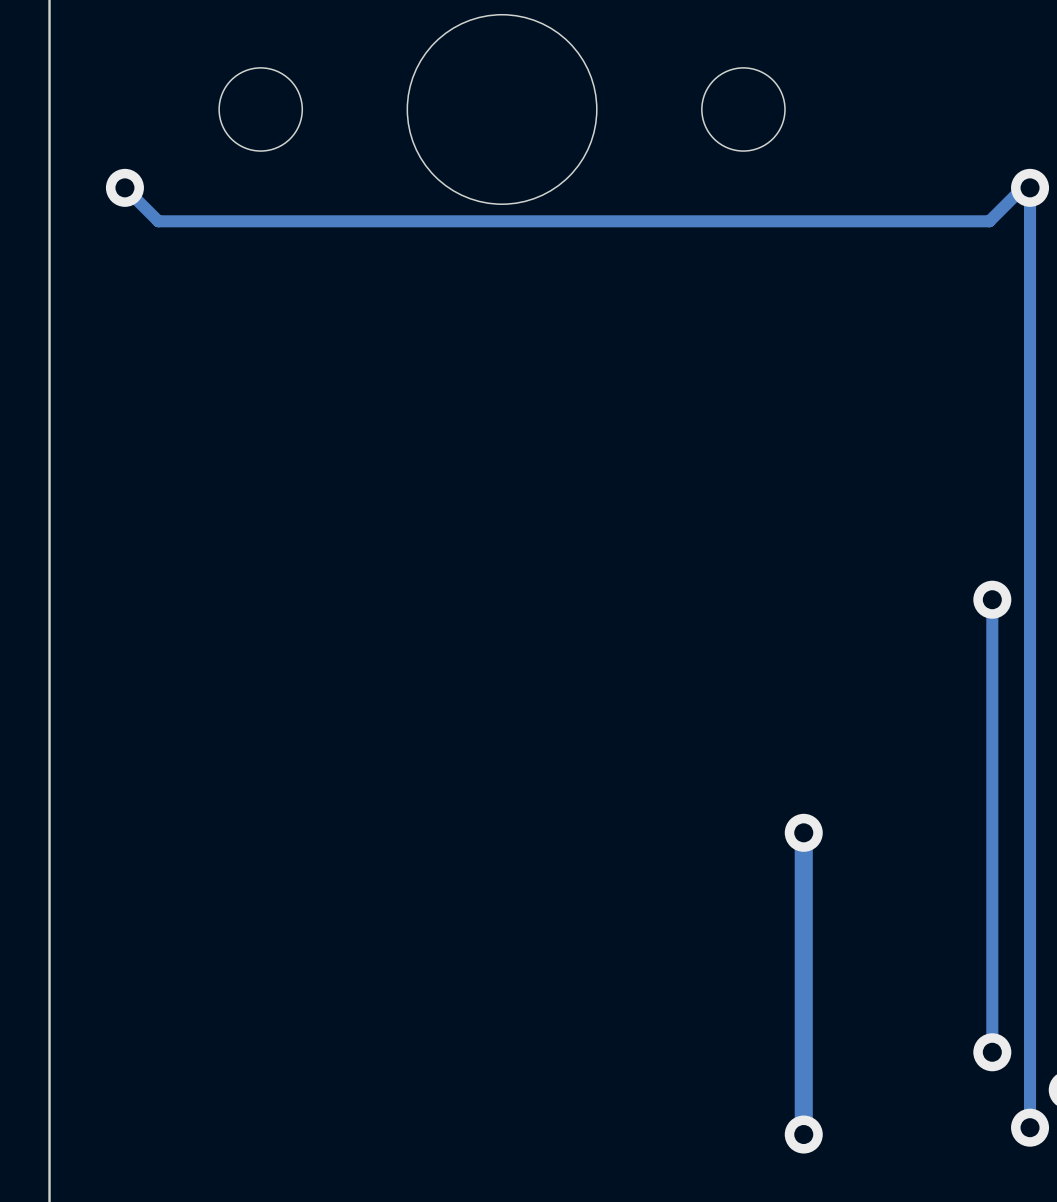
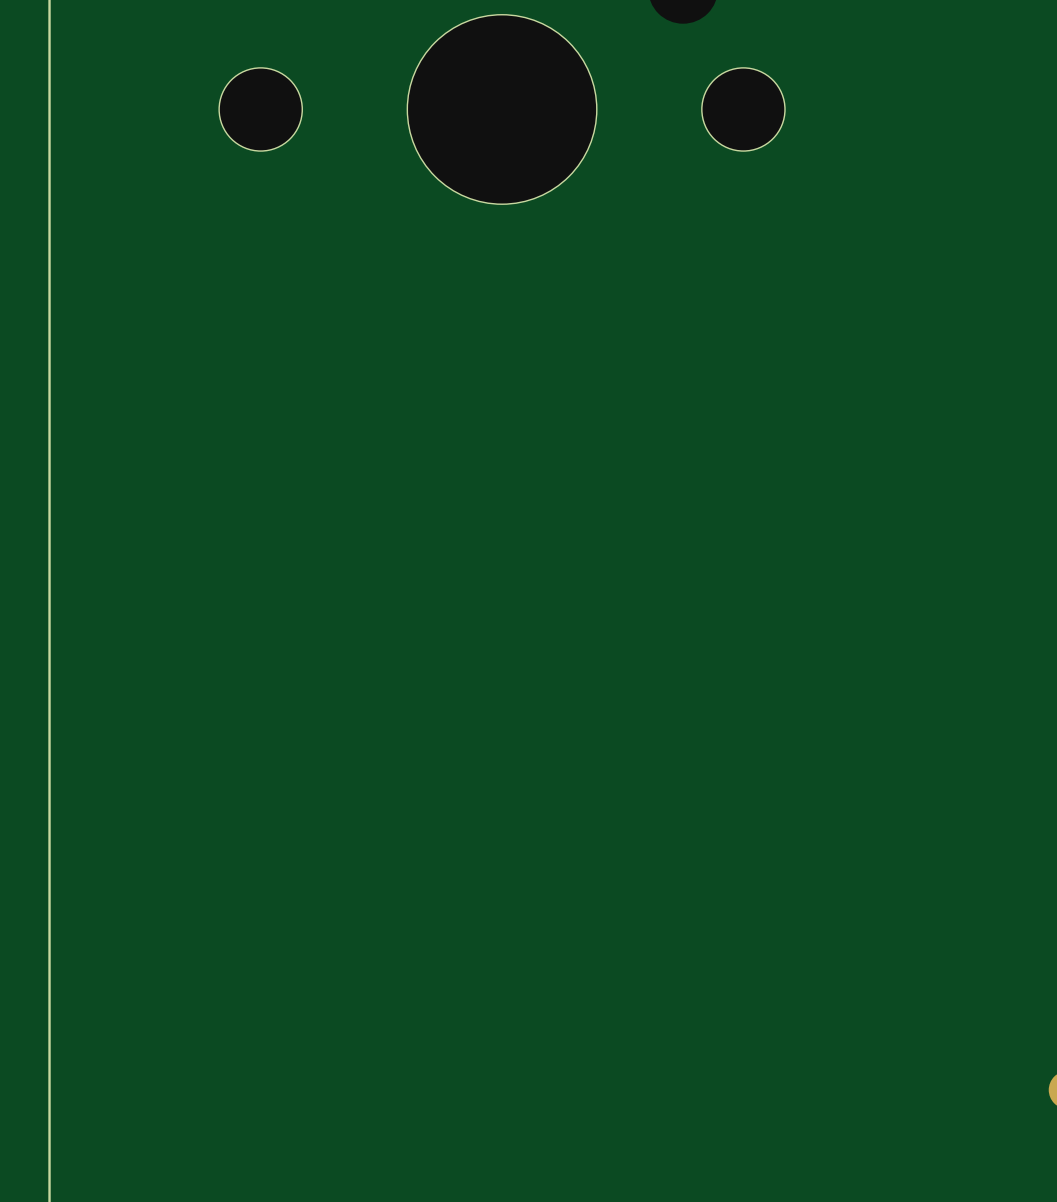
track: (124, 187) (158, 221) (989, 221) (1022, 187) (1030, 187) (1030, 1127) -> none
via: (124, 187) -> none
via: (1030, 187) -> none
track: (992, 599) (992, 1052) -> none
via: (992, 599) -> none
track: (803, 832) (803, 1134) -> none
via: (803, 832) -> none
via: (992, 1052) -> none
via: (1030, 1127) -> none
via: (803, 1134) -> none

